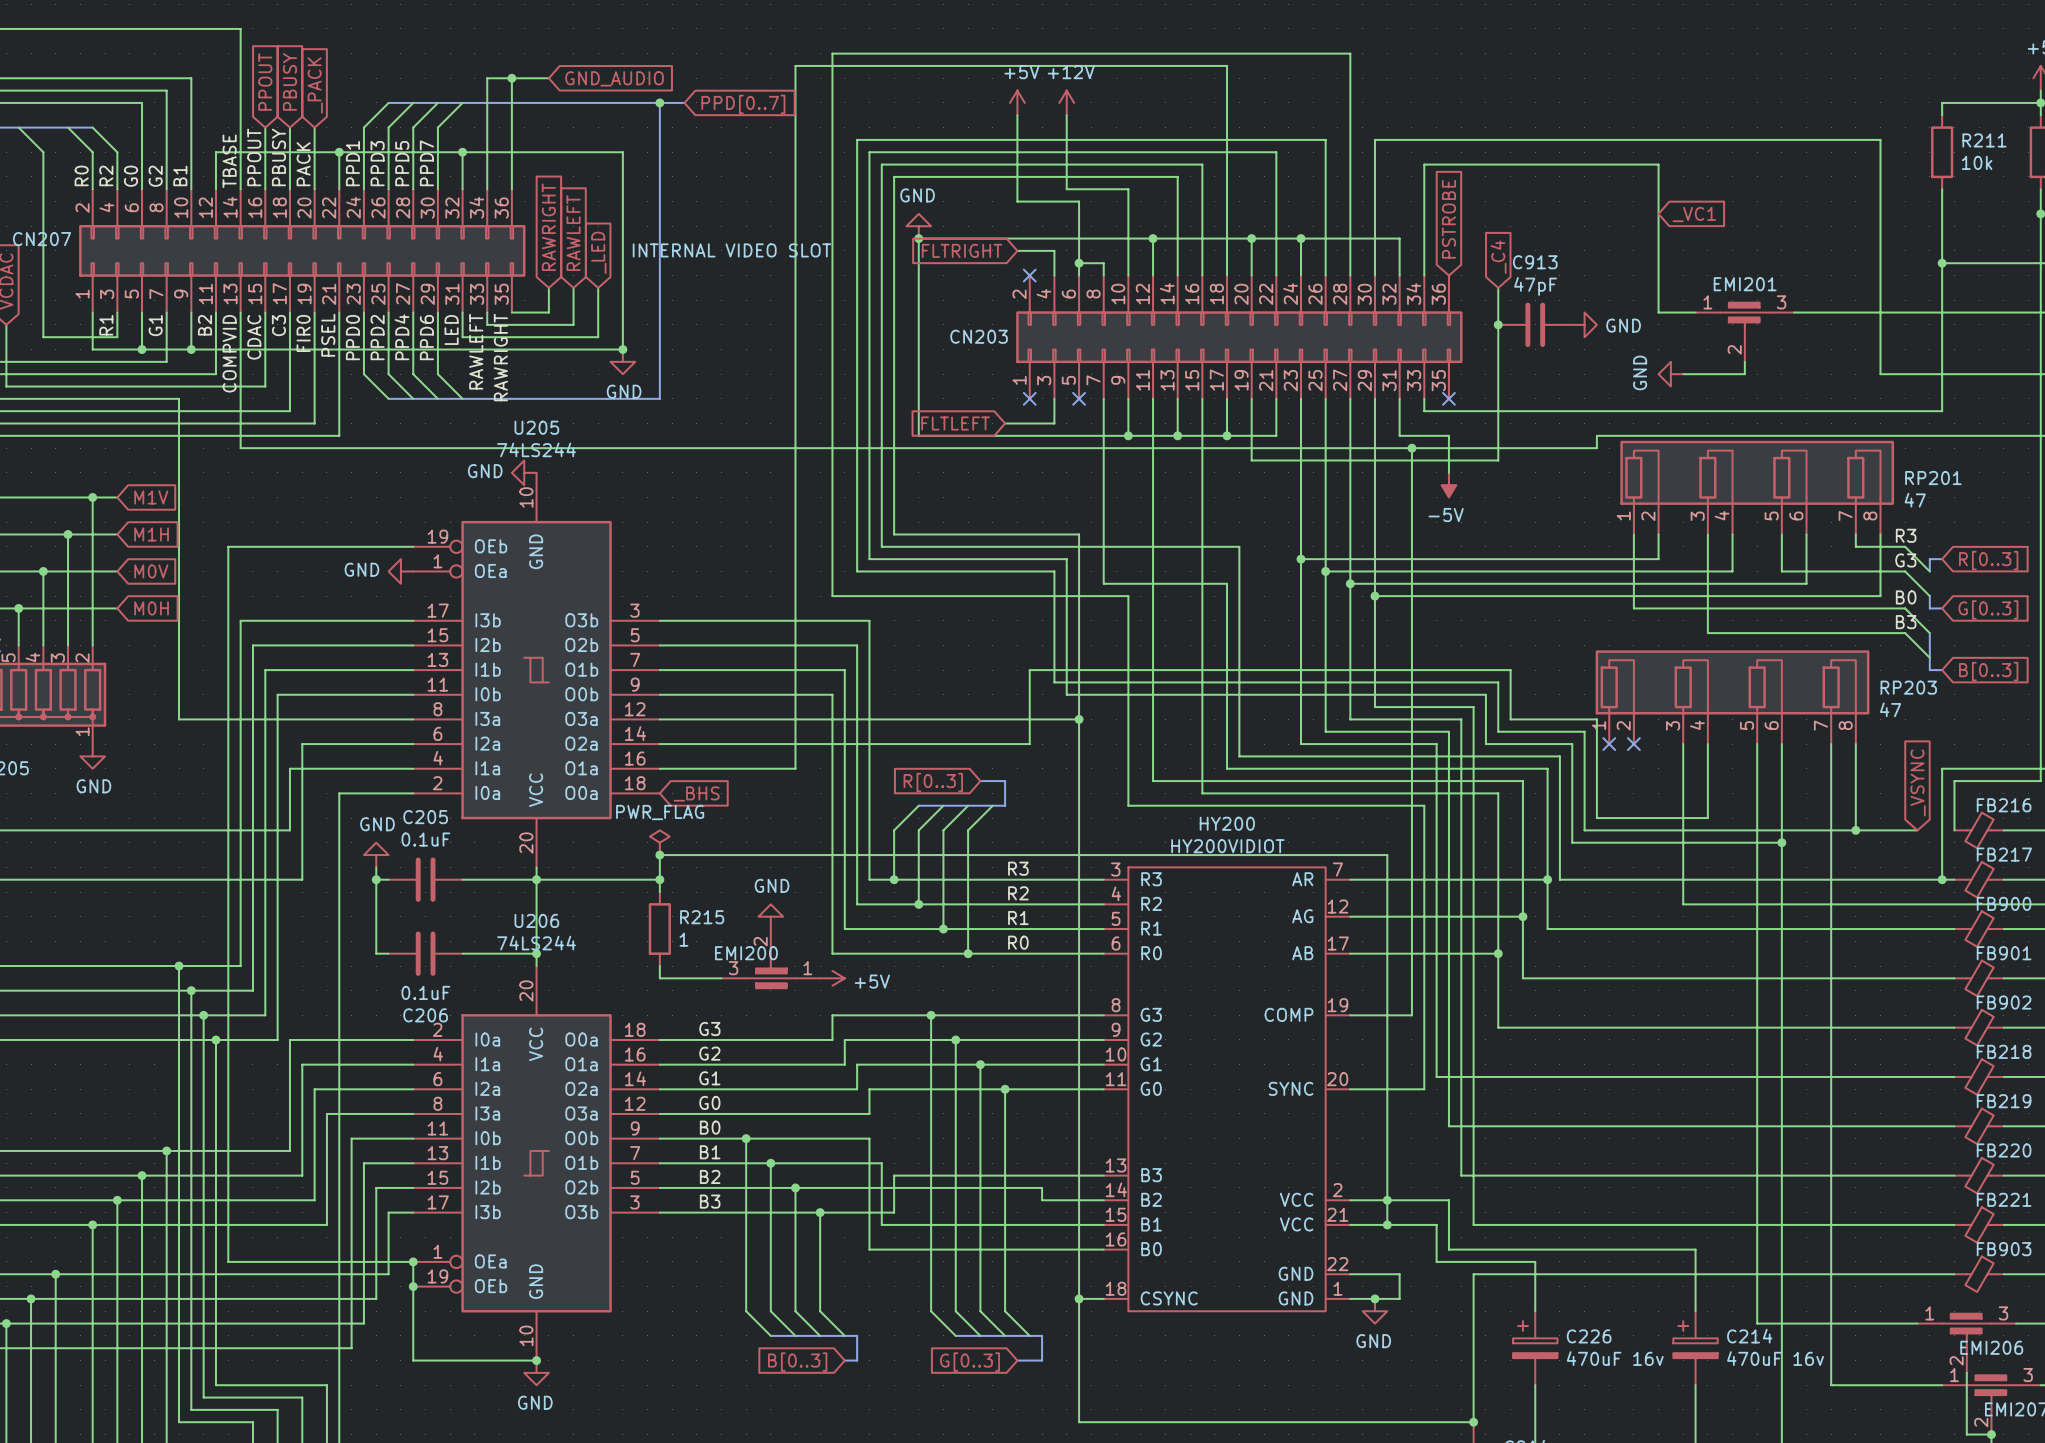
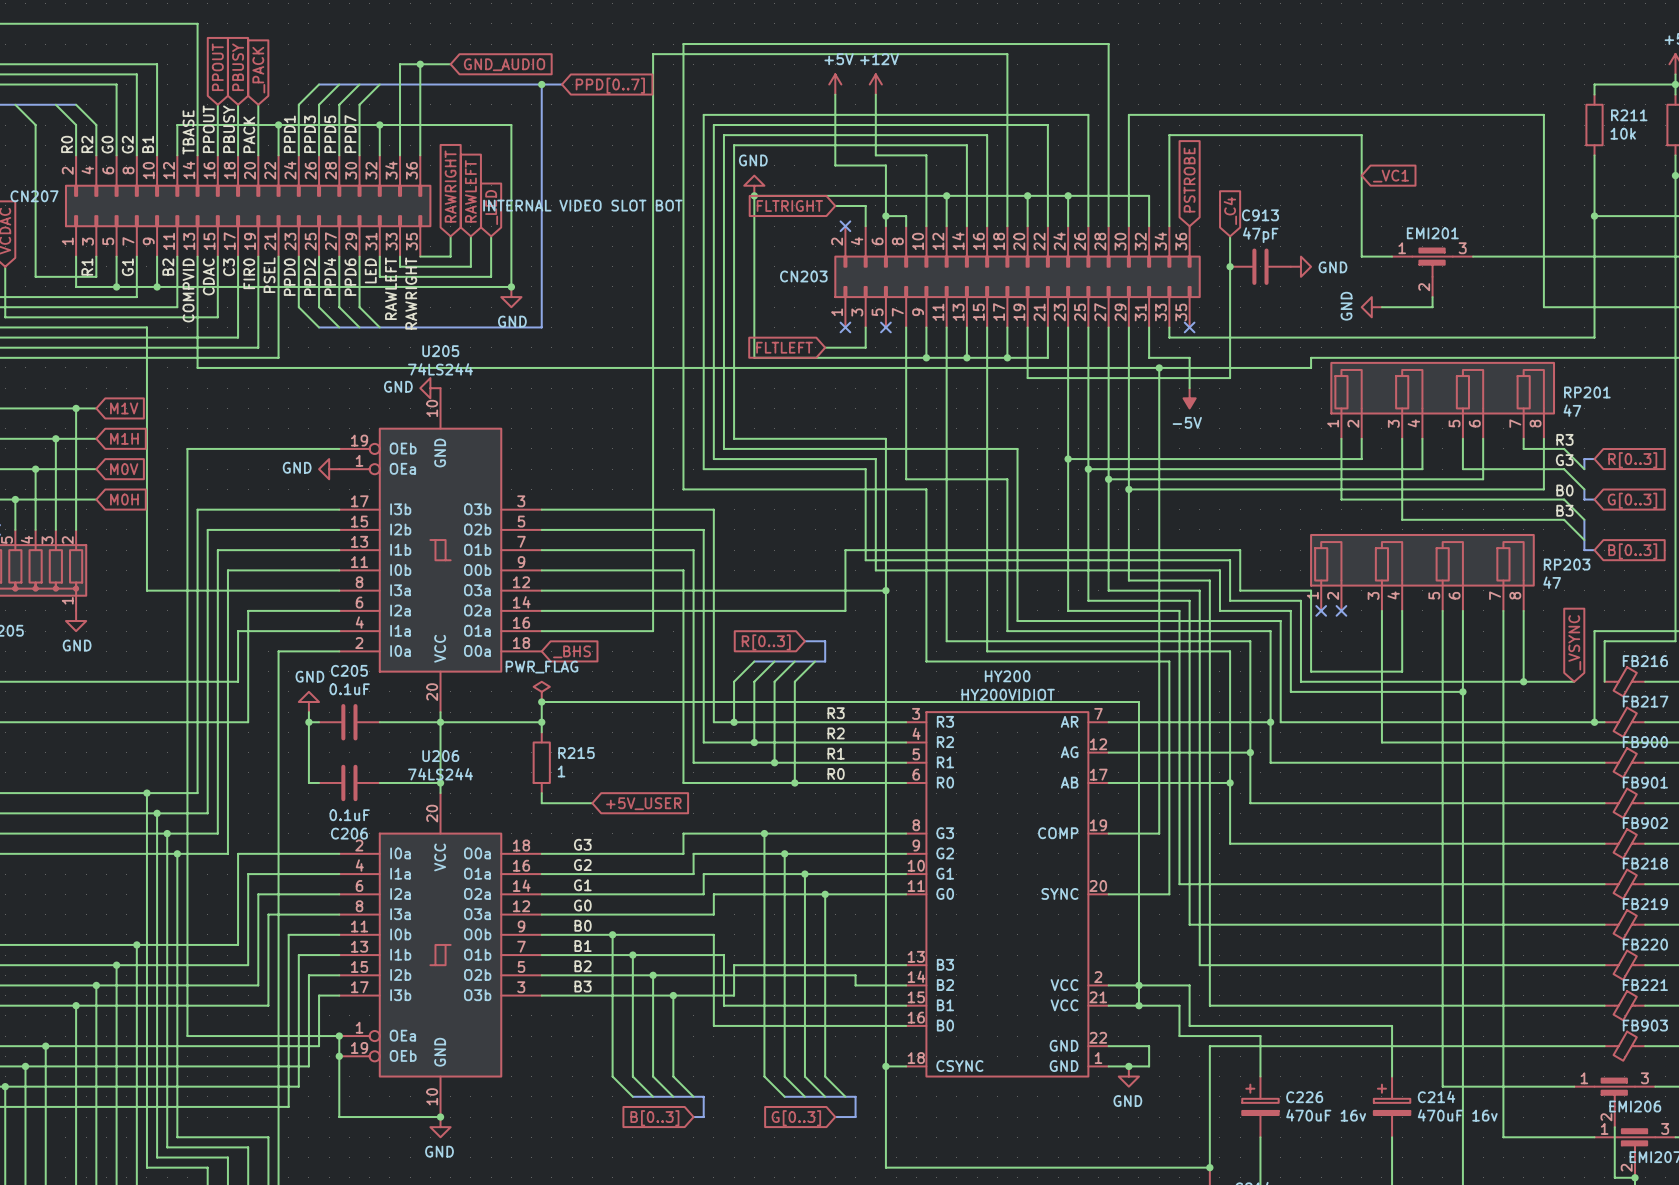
CN207 value: INTERNAL VIDEO SLOT (731, 250) -> INTERNAL VIDEO SLOT BOT (582, 205)
power symbol: GND (770, 916) -> none
EMI200: (770, 958) -> none
global label: none -> +5V_USER (643, 803)
power symbol: +5V (832, 978) -> none

